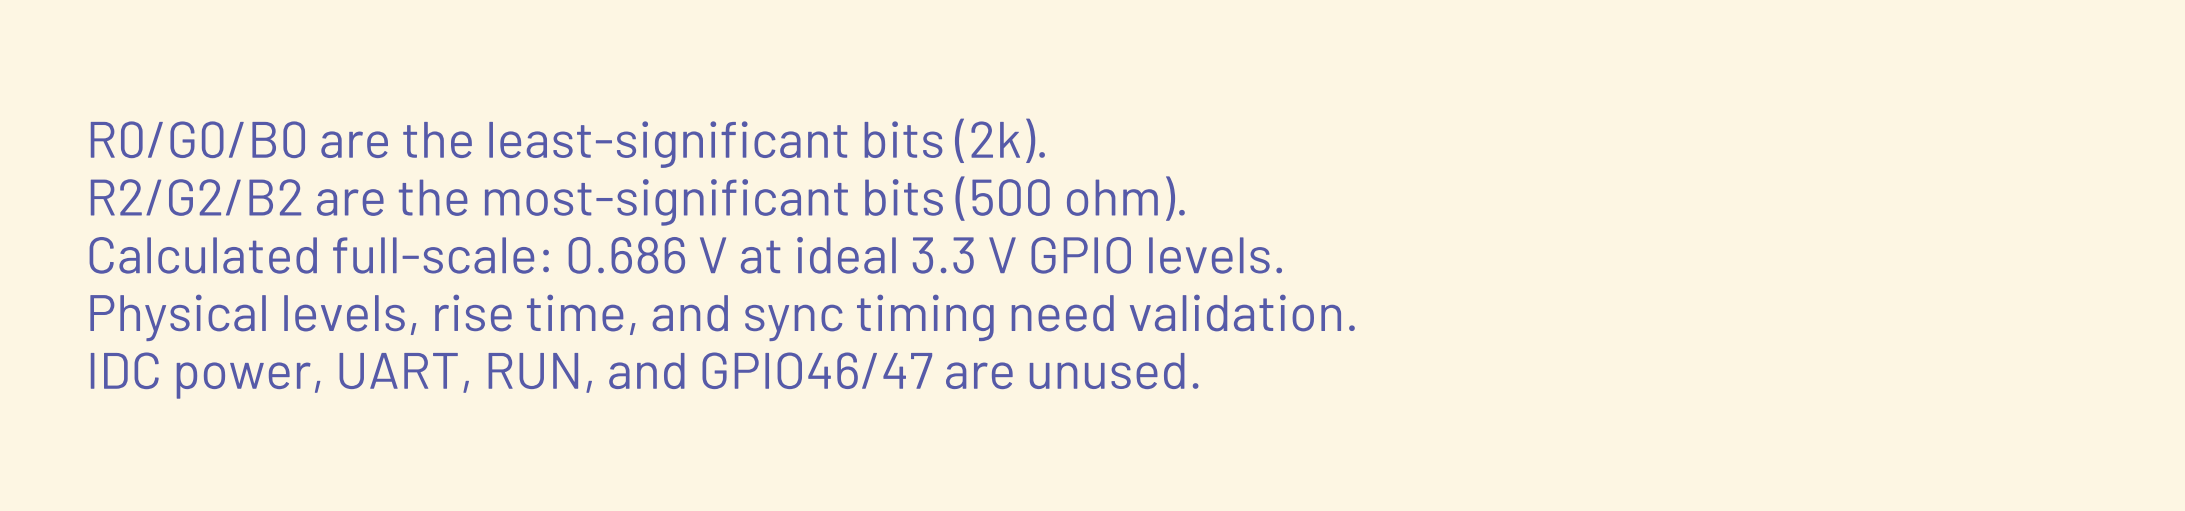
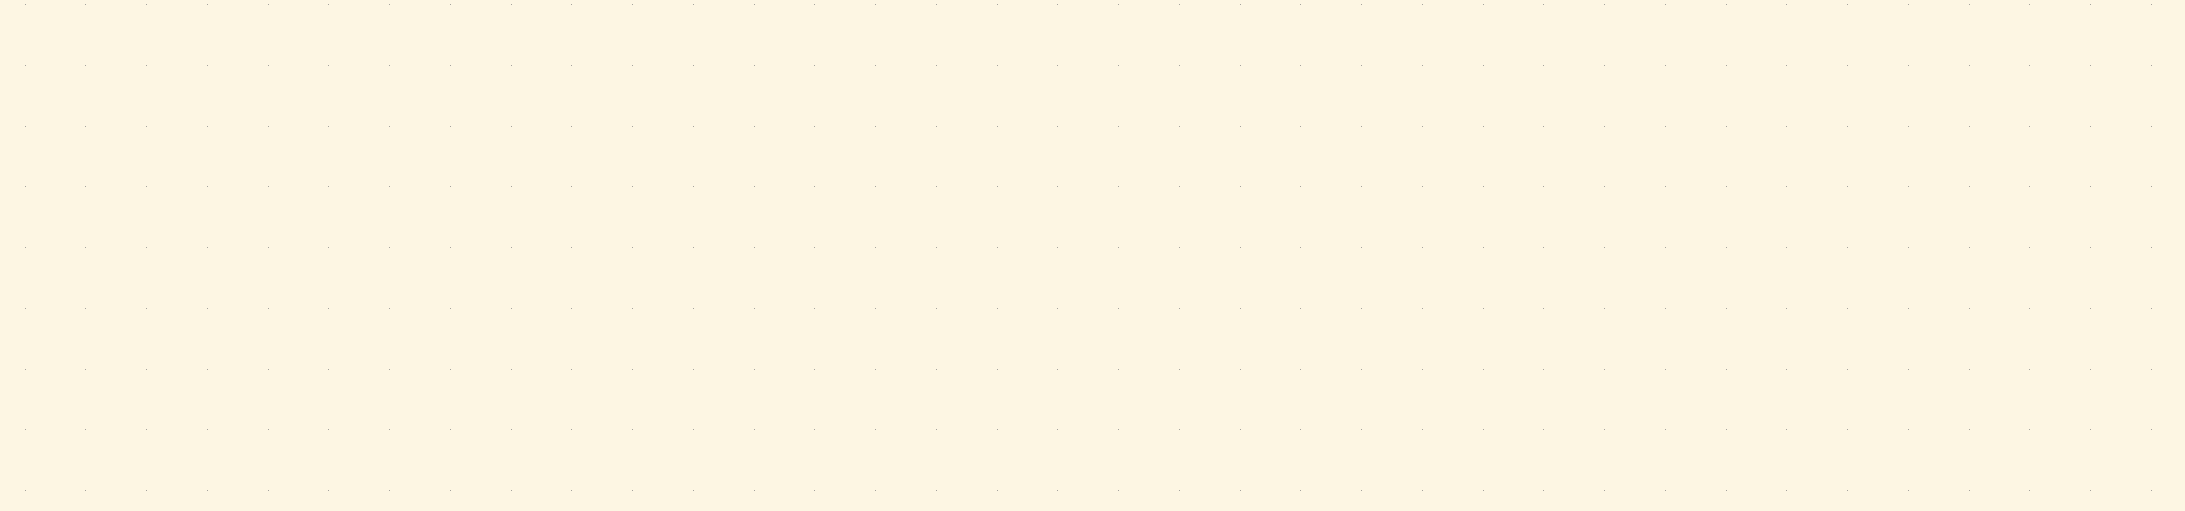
text: R0/G0/B0 are the least-significant bits (2k). (567, 143) -> none
text: R2/G2/B2 are the most-significant bits (500 ohm). (637, 201) -> none
text: Calculated full-scale: 0.686 V at ideal 3.3 V GPIO levels. (685, 255) -> none
text: Physical levels, rise time, and sync timing need validation. (722, 317) -> none
text: IDC power, UART, RUN, and GPIO46/47 are unused. (644, 375) -> none

